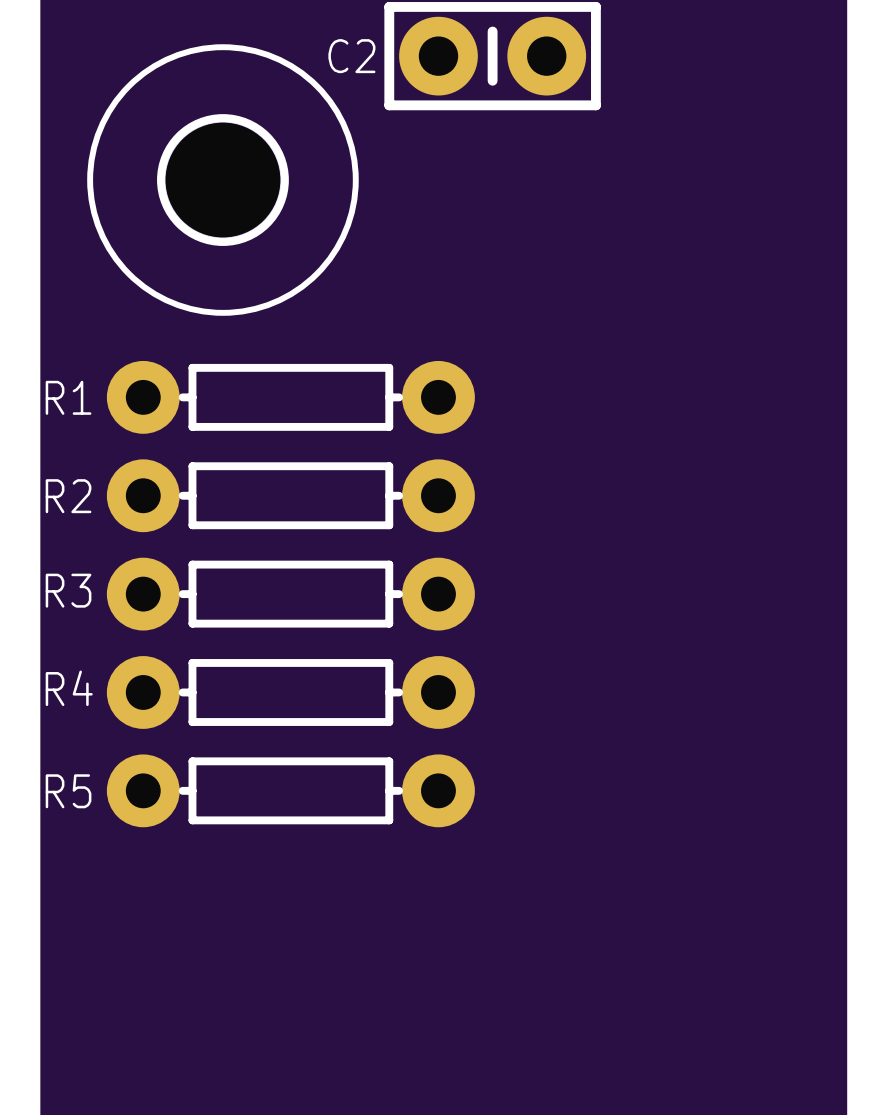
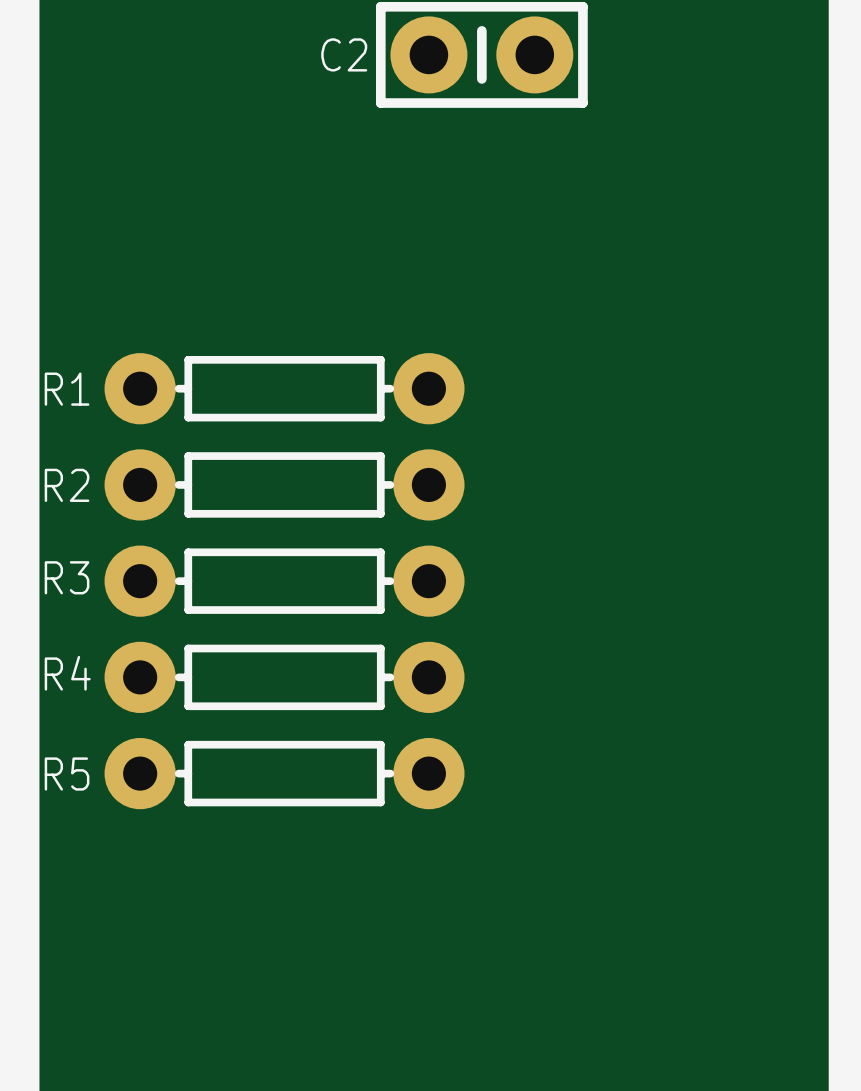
part: (222, 180) -> none

